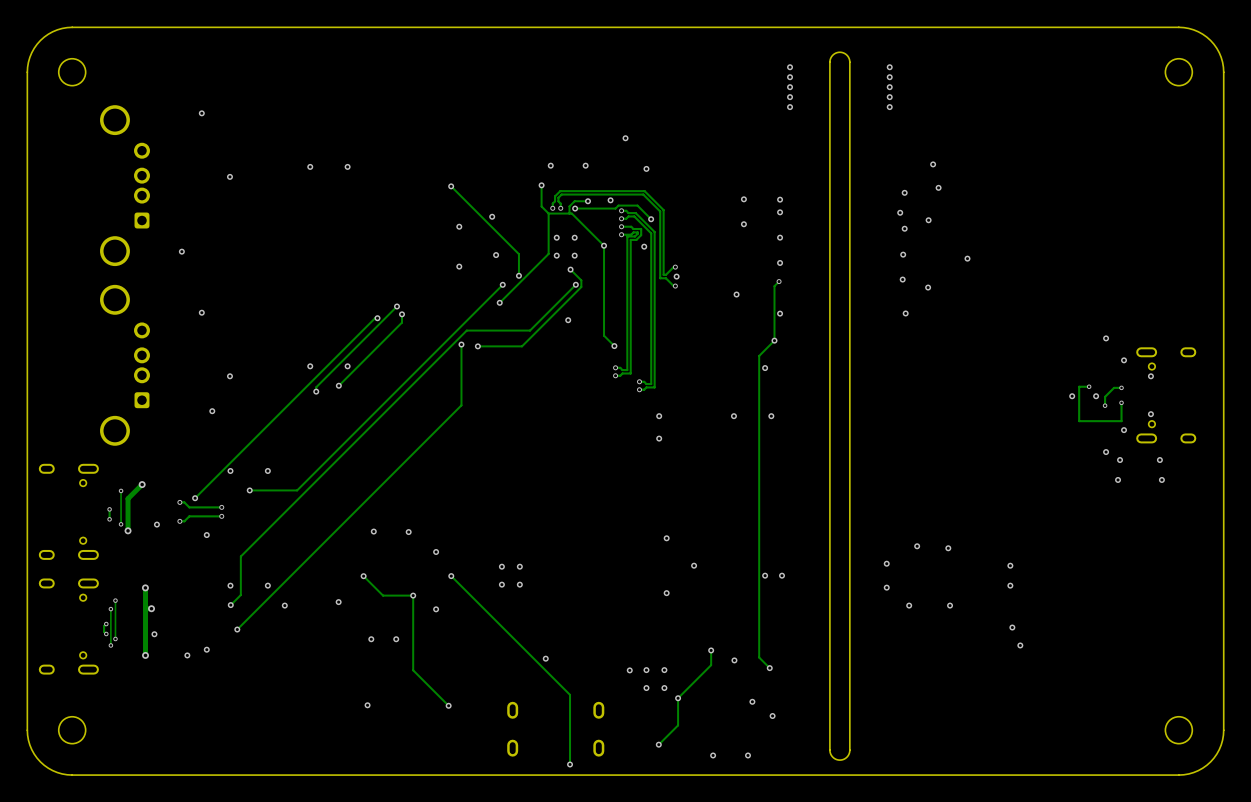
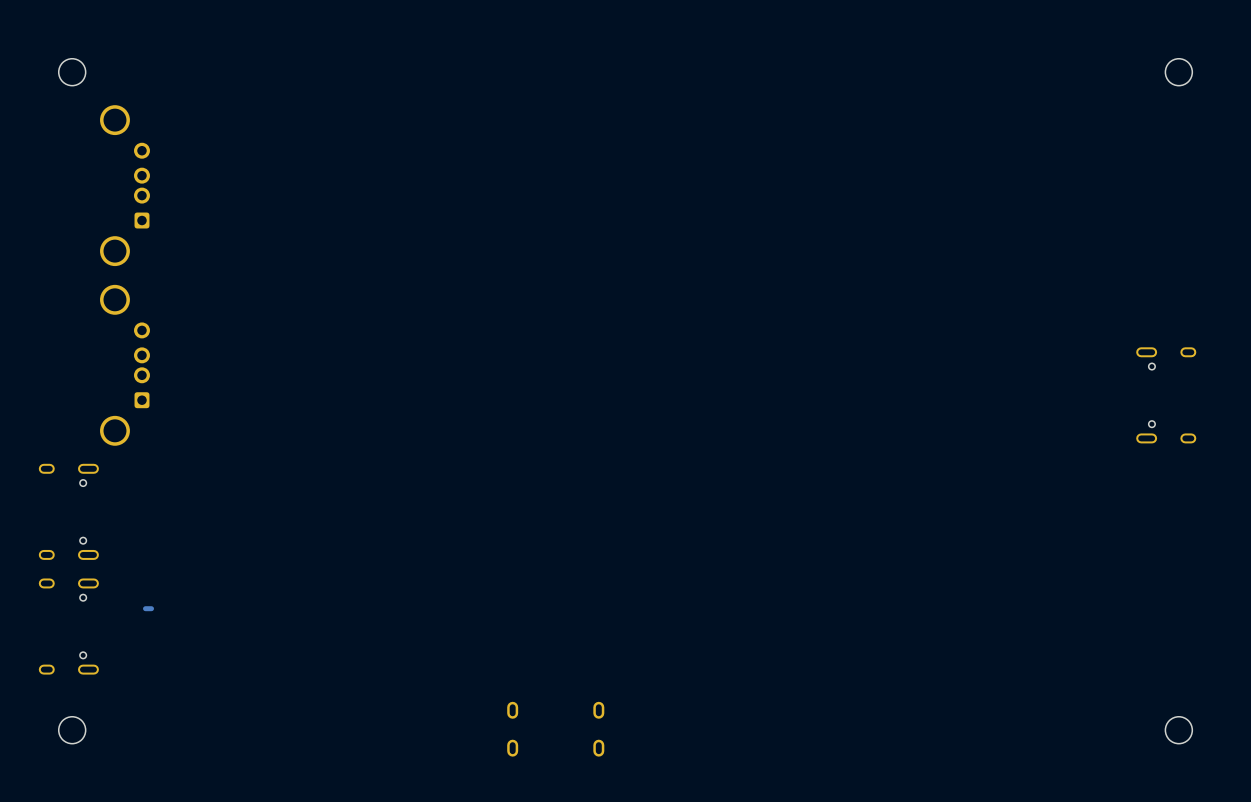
board edge: (1178, 27) (72, 27) (57, 29) (48, 34) (34, 48) (29, 57) (27, 72) (27, 730) (29, 745) (34, 754) (44, 765) (52, 770) (72, 775) (1178, 775) (1193, 772) (1202, 768) (1210, 761) (1219, 749) (1223, 730) (1223, 72) (1219, 52) (1210, 40) (1193, 29) (1178, 27) -> none
board edge: (849, 62) (849, 750) (846, 757) (839, 760) (832, 757) (829, 750) (829, 62) (832, 55) (839, 52) (846, 55) (849, 62) -> none
via: (790, 67) -> none
via: (889, 67) -> none
via: (790, 77) -> none
via: (889, 77) -> none
via: (790, 87) -> none
via: (889, 87) -> none
via: (790, 97) -> none
via: (889, 97) -> none
via: (790, 107) -> none
via: (889, 107) -> none
via: (201, 113) -> none
via: (625, 138) -> none
via: (933, 164) -> none
via: (550, 165) -> none
via: (585, 165) -> none
via: (310, 166) -> none
via: (347, 166) -> none
via: (646, 168) -> none
via: (229, 176) -> none
track: (541, 185) (541, 206) (548, 213) -> none
via: (541, 185) -> none
track: (451, 186) (518, 254) (518, 275) -> none
via: (451, 186) -> none
via: (938, 187) -> none
via: (904, 192) -> none
via: (743, 199) -> none
via: (780, 199) -> none
via: (610, 200) -> none
track: (587, 201) (574, 201) (569, 206) (569, 213) -> none
via: (587, 201) -> none
track: (552, 208) (555, 196) (560, 191) (644, 191) (663, 210) (663, 274) (675, 267) -> none
via: (552, 208) -> none
track: (560, 208) (558, 197) (561, 194) (643, 194) (660, 211) (660, 278) (665, 278) (675, 286) -> none
via: (560, 208) -> none
track: (575, 208) (615, 208) (618, 205) (637, 205) (651, 219) -> none
via: (575, 208) -> none
track: (621, 210) (635, 213) (654, 232) (654, 387) (639, 389) -> none
via: (621, 210) -> none
via: (780, 212) -> none
via: (900, 212) -> none
track: (548, 213) (548, 253) (499, 302) -> none
track: (548, 213) (571, 213) (604, 245) (604, 335) (614, 346) -> none
via: (492, 216) -> none
track: (621, 218) (634, 216) (651, 233) (651, 384) (639, 381) -> none
via: (621, 218) -> none
via: (651, 219) -> none
via: (928, 220) -> none
via: (743, 224) -> none
via: (459, 226) -> none
track: (621, 226) (641, 229) (641, 235) (636, 239) (630, 239) (630, 373) (615, 375) -> none
via: (621, 226) -> none
via: (904, 228) -> none
track: (621, 234) (637, 232) (635, 236) (627, 236) (627, 370) (615, 367) -> none
via: (621, 234) -> none
via: (556, 237) -> none
via: (574, 237) -> none
via: (780, 237) -> none
via: (604, 245) -> none
via: (644, 246) -> none
via: (181, 251) -> none
via: (903, 254) -> none
via: (496, 255) -> none
via: (556, 255) -> none
via: (574, 255) -> none
via: (967, 258) -> none
via: (780, 262) -> none
via: (459, 266) -> none
via: (675, 267) -> none
track: (570, 269) (581, 280) (581, 287) (522, 346) (477, 346) -> none
via: (570, 269) -> none
via: (518, 275) -> none
via: (676, 276) -> none
via: (902, 279) -> none
track: (779, 281) (774, 286) (774, 340) (759, 355) (759, 657) (769, 668) -> none
via: (779, 281) -> none
track: (502, 284) (297, 490) (249, 490) -> none
via: (502, 284) -> none
track: (575, 284) (530, 330) (466, 330) (240, 556) (240, 595) (230, 605) -> none
via: (575, 284) -> none
via: (675, 286) -> none
via: (928, 287) -> none
via: (736, 294) -> none
via: (499, 302) -> none
track: (397, 306) (316, 387) (316, 391) -> none
via: (397, 306) -> none
via: (201, 312) -> none
via: (780, 313) -> none
via: (905, 313) -> none
track: (402, 314) (402, 322) (338, 385) -> none
via: (402, 314) -> none
track: (377, 318) (375, 318) (195, 498) -> none
via: (377, 318) -> none
via: (568, 320) -> none
via: (1106, 338) -> none
via: (774, 340) -> none
track: (461, 344) (461, 405) (237, 629) -> none
via: (461, 344) -> none
via: (477, 346) -> none
via: (614, 346) -> none
via: (1124, 360) -> none
via: (310, 366) -> none
via: (347, 366) -> none
via: (615, 367) -> none
via: (765, 368) -> none
via: (615, 375) -> none
via: (229, 376) -> none
via: (1150, 376) -> none
via: (639, 381) -> none
via: (338, 385) -> none
track: (1089, 386) (1079, 386) (1079, 421) (1121, 421) (1121, 402) -> none
via: (1089, 386) -> none
track: (1121, 387) (1114, 387) (1105, 396) (1105, 405) -> none
via: (1121, 387) -> none
via: (639, 389) -> none
via: (316, 391) -> none
via: (1072, 396) -> none
via: (1096, 396) -> none
via: (1121, 402) -> none
via: (1105, 405) -> none
via: (212, 411) -> none
via: (1150, 414) -> none
via: (659, 416) -> none
via: (733, 416) -> none
via: (771, 416) -> none
via: (1124, 430) -> none
via: (659, 438) -> none
via: (1106, 452) -> none
via: (1120, 460) -> none
via: (1159, 460) -> none
via: (230, 470) -> none
via: (267, 470) -> none
via: (1118, 479) -> none
via: (1161, 479) -> none
track: (142, 484) (128, 498) (128, 530) -> none
via: (142, 484) -> none
track: (121, 490) (121, 524) -> none
via: (121, 490) -> none
via: (249, 490) -> none
via: (195, 498) -> none
track: (179, 502) (184, 502) (189, 507) (221, 507) -> none
via: (179, 502) -> none
via: (221, 507) -> none
track: (109, 509) (109, 519) -> none
via: (109, 509) -> none
track: (221, 516) (189, 516) (184, 521) (179, 521) -> none
via: (221, 516) -> none
via: (109, 519) -> none
via: (179, 521) -> none
via: (121, 524) -> none
via: (156, 524) -> none
via: (128, 530) -> none
via: (373, 531) -> none
via: (408, 532) -> none
via: (206, 535) -> none
via: (666, 538) -> none
via: (917, 546) -> none
via: (948, 548) -> none
via: (436, 552) -> none
via: (886, 563) -> none
via: (694, 565) -> none
via: (1010, 565) -> none
via: (501, 566) -> none
via: (519, 566) -> none
via: (765, 575) -> none
via: (782, 575) -> none
track: (363, 576) (383, 595) (413, 595) (413, 670) (448, 705) -> none
via: (363, 576) -> none
track: (451, 576) (570, 694) (570, 764) -> none
via: (451, 576) -> none
via: (501, 584) -> none
via: (519, 584) -> none
via: (230, 585) -> none
via: (267, 585) -> none
via: (1010, 585) -> none
track: (145, 587) (145, 655) -> none
via: (145, 587) -> none
via: (886, 587) -> none
via: (666, 593) -> none
via: (413, 595) -> none
track: (115, 600) (115, 638) -> none
via: (115, 600) -> none
via: (338, 602) -> none
via: (230, 605) -> none
via: (284, 605) -> none
via: (909, 605) -> none
via: (950, 605) -> none
via: (151, 608) -> none
track: (110, 609) (110, 645) -> none
via: (110, 609) -> none
via: (436, 609) -> none
track: (106, 624) (104, 626) (104, 631) (106, 634) -> none
via: (106, 624) -> none
via: (1012, 627) -> none
via: (237, 629) -> none
via: (106, 634) -> none
via: (154, 634) -> none
via: (115, 638) -> none
via: (371, 639) -> none
via: (396, 639) -> none
via: (110, 645) -> none
via: (1020, 645) -> none
via: (206, 649) -> none
track: (711, 650) (711, 665) (678, 698) (678, 725) (658, 744) -> none
via: (711, 650) -> none
via: (145, 655) -> none
via: (187, 655) -> none
via: (545, 658) -> none
via: (734, 660) -> none
via: (769, 668) -> none
via: (629, 670) -> none
via: (646, 670) -> none
via: (664, 670) -> none
via: (646, 688) -> none
via: (664, 688) -> none
via: (678, 698) -> none
via: (752, 701) -> none
via: (367, 705) -> none
via: (448, 705) -> none
via: (772, 716) -> none
via: (658, 744) -> none
via: (713, 755) -> none
via: (748, 755) -> none
via: (570, 764) -> none

